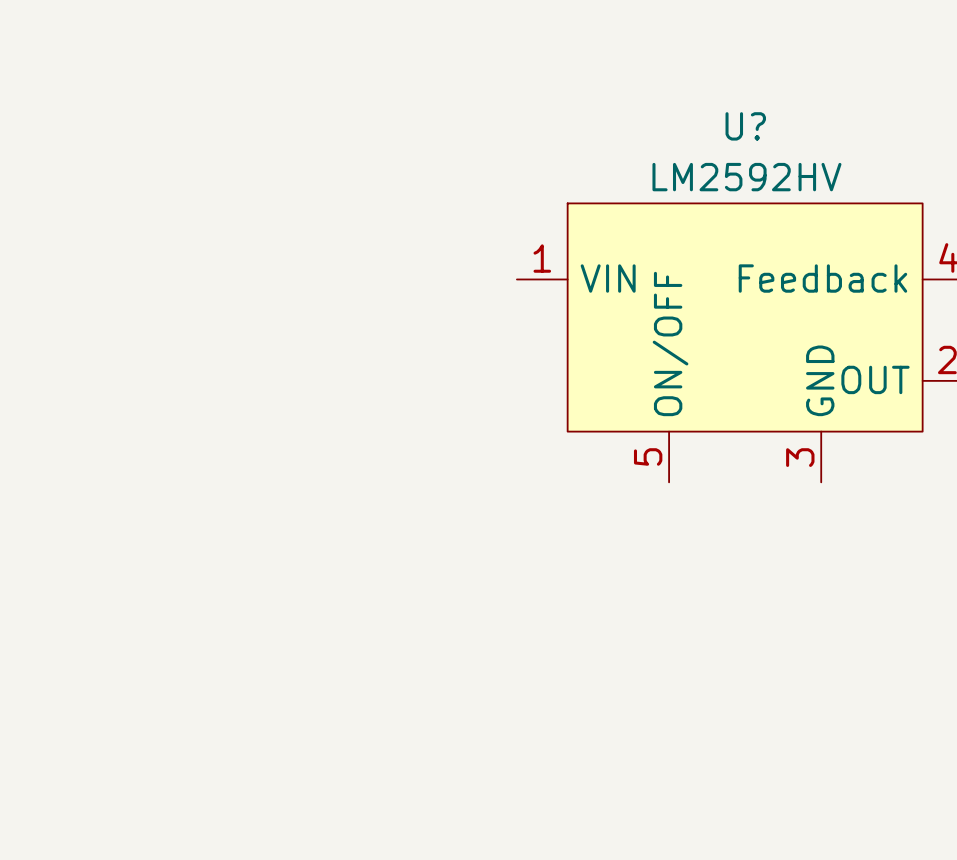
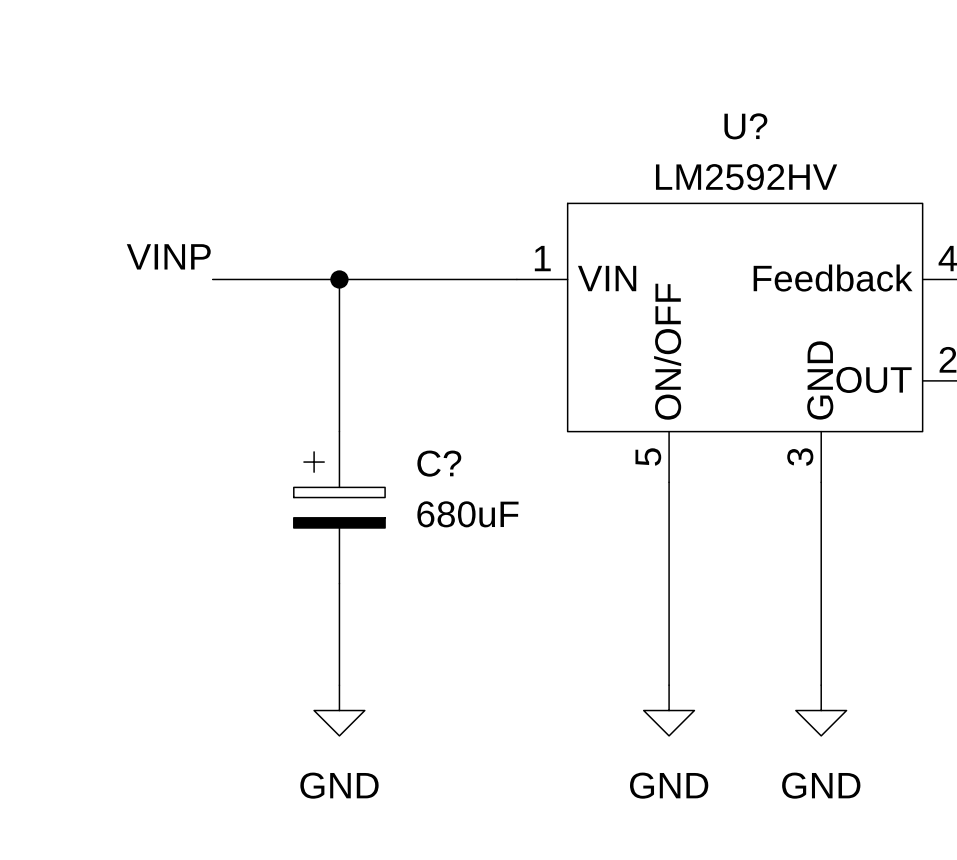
label: none -> VINP (168, 256)
wire: none -> (212, 279) (516, 279)
wire: none -> (339, 279) (339, 431)
junction: none -> (339, 279)
wire: none -> (669, 482) (669, 685)
wire: none -> (821, 482) (821, 685)
C?: none -> 680uF (339, 507)
wire: none -> (339, 583) (339, 685)
power symbol: none -> GND (339, 710)
power symbol: none -> GND (669, 710)
power symbol: none -> GND (821, 710)

